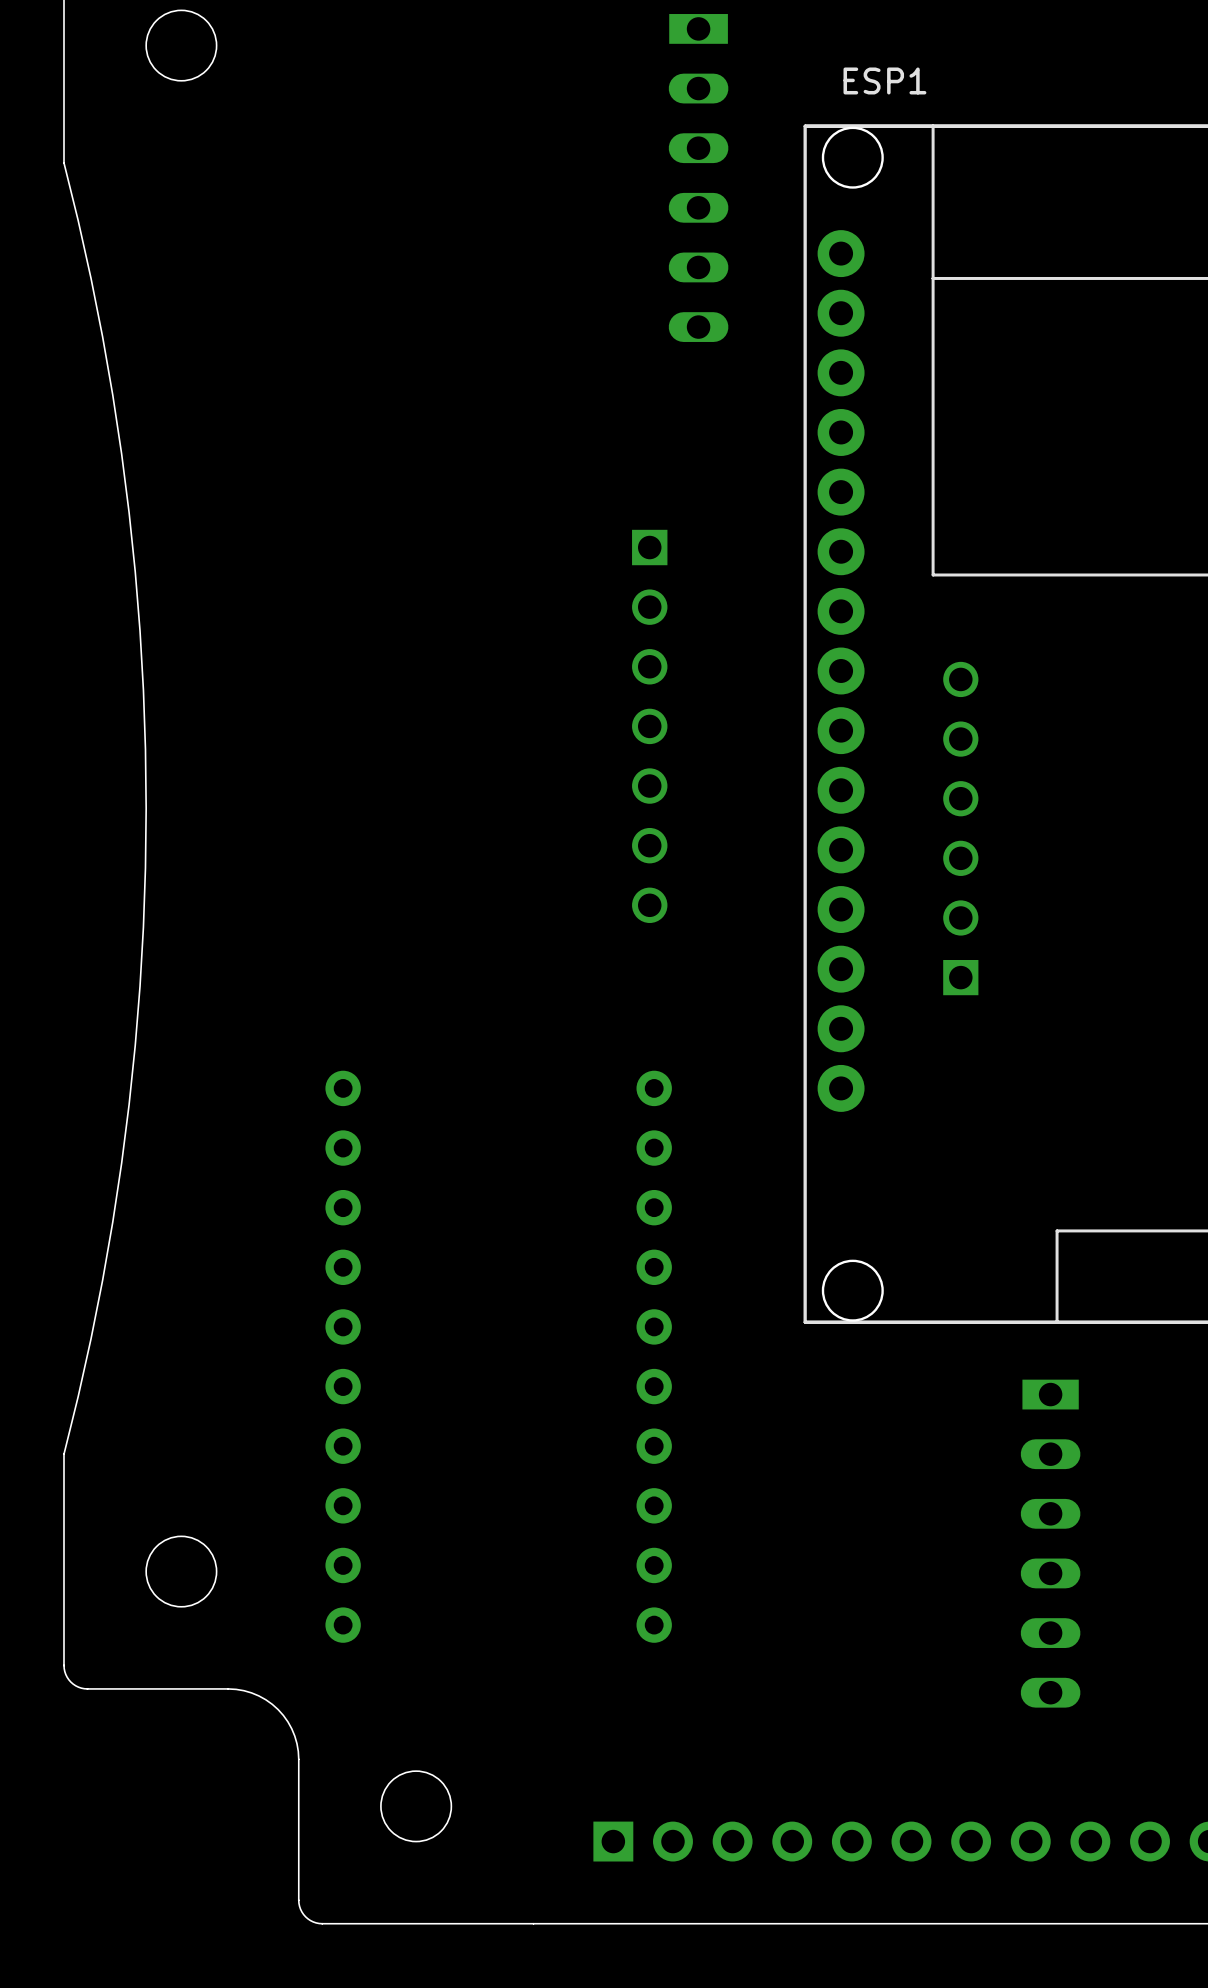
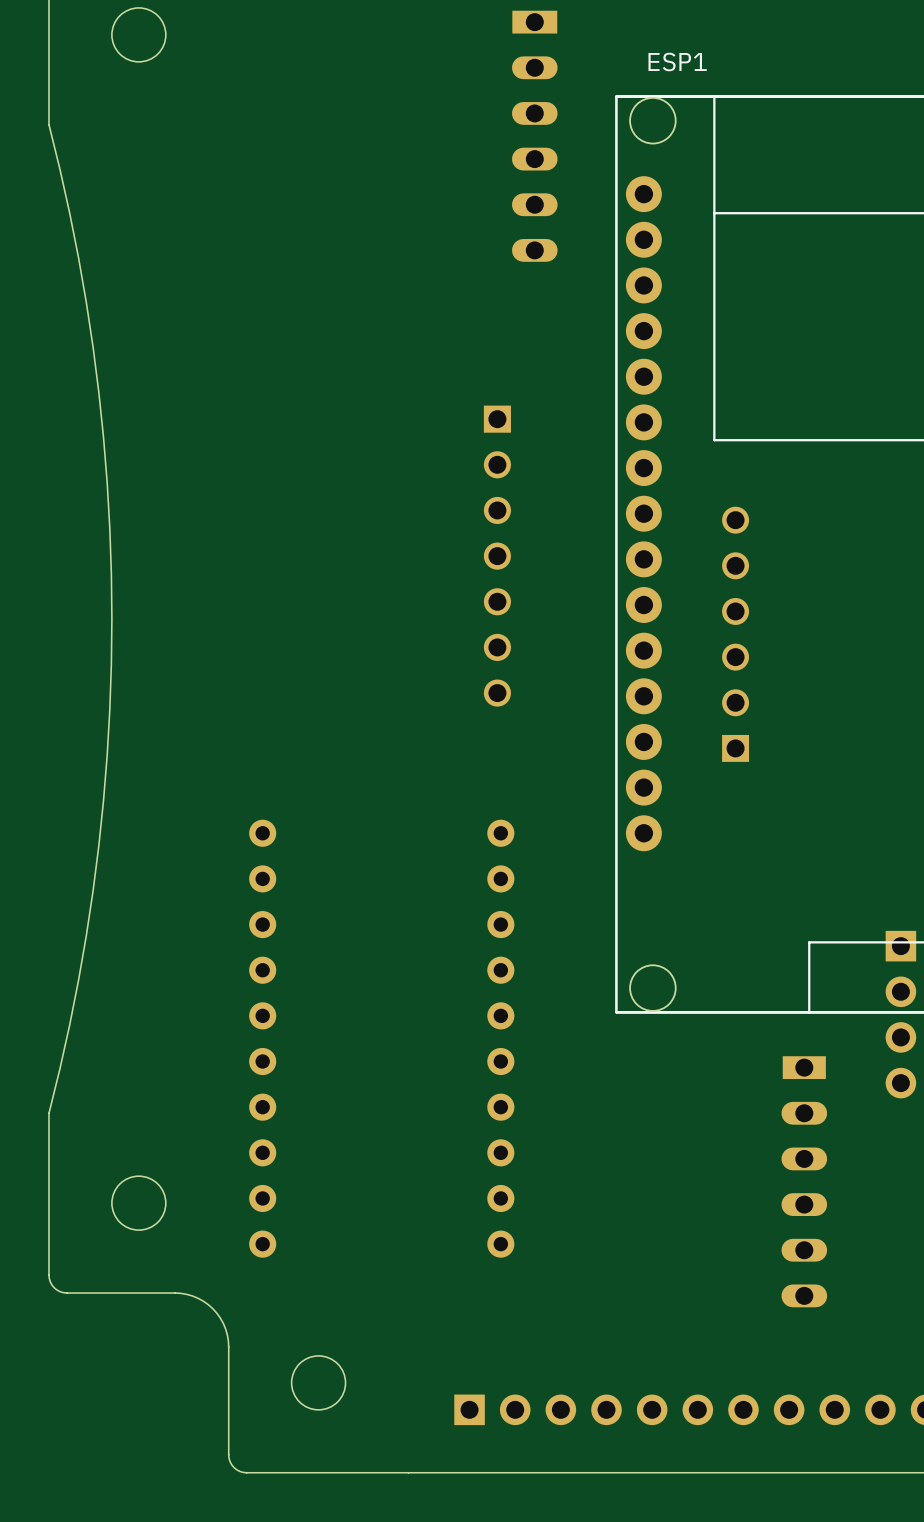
part: none -> (900, 1014)

